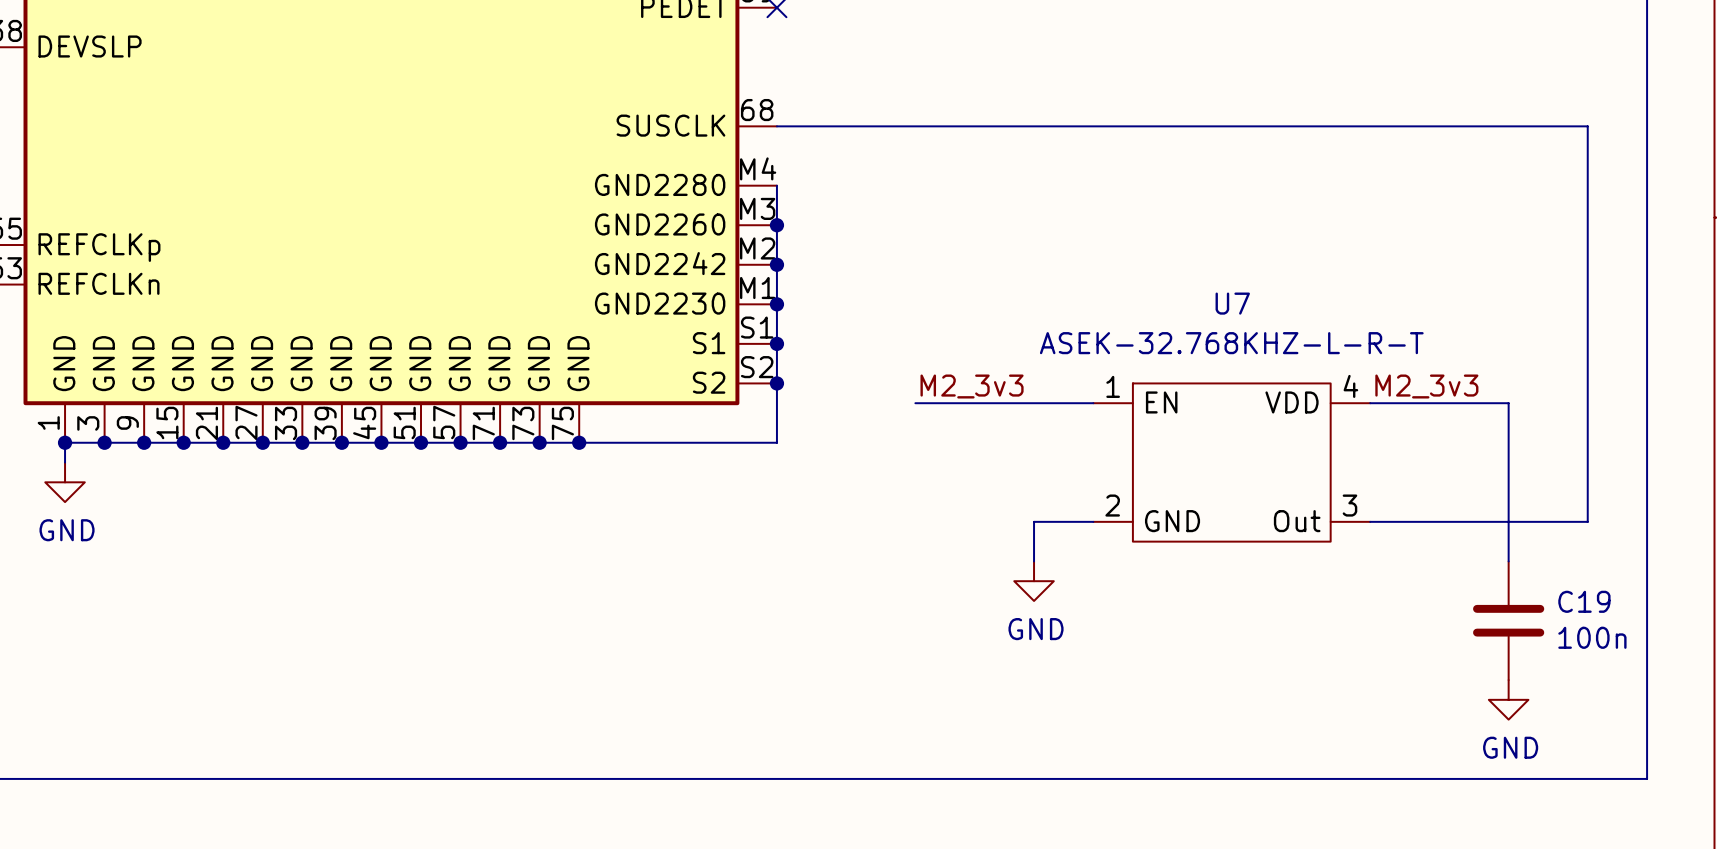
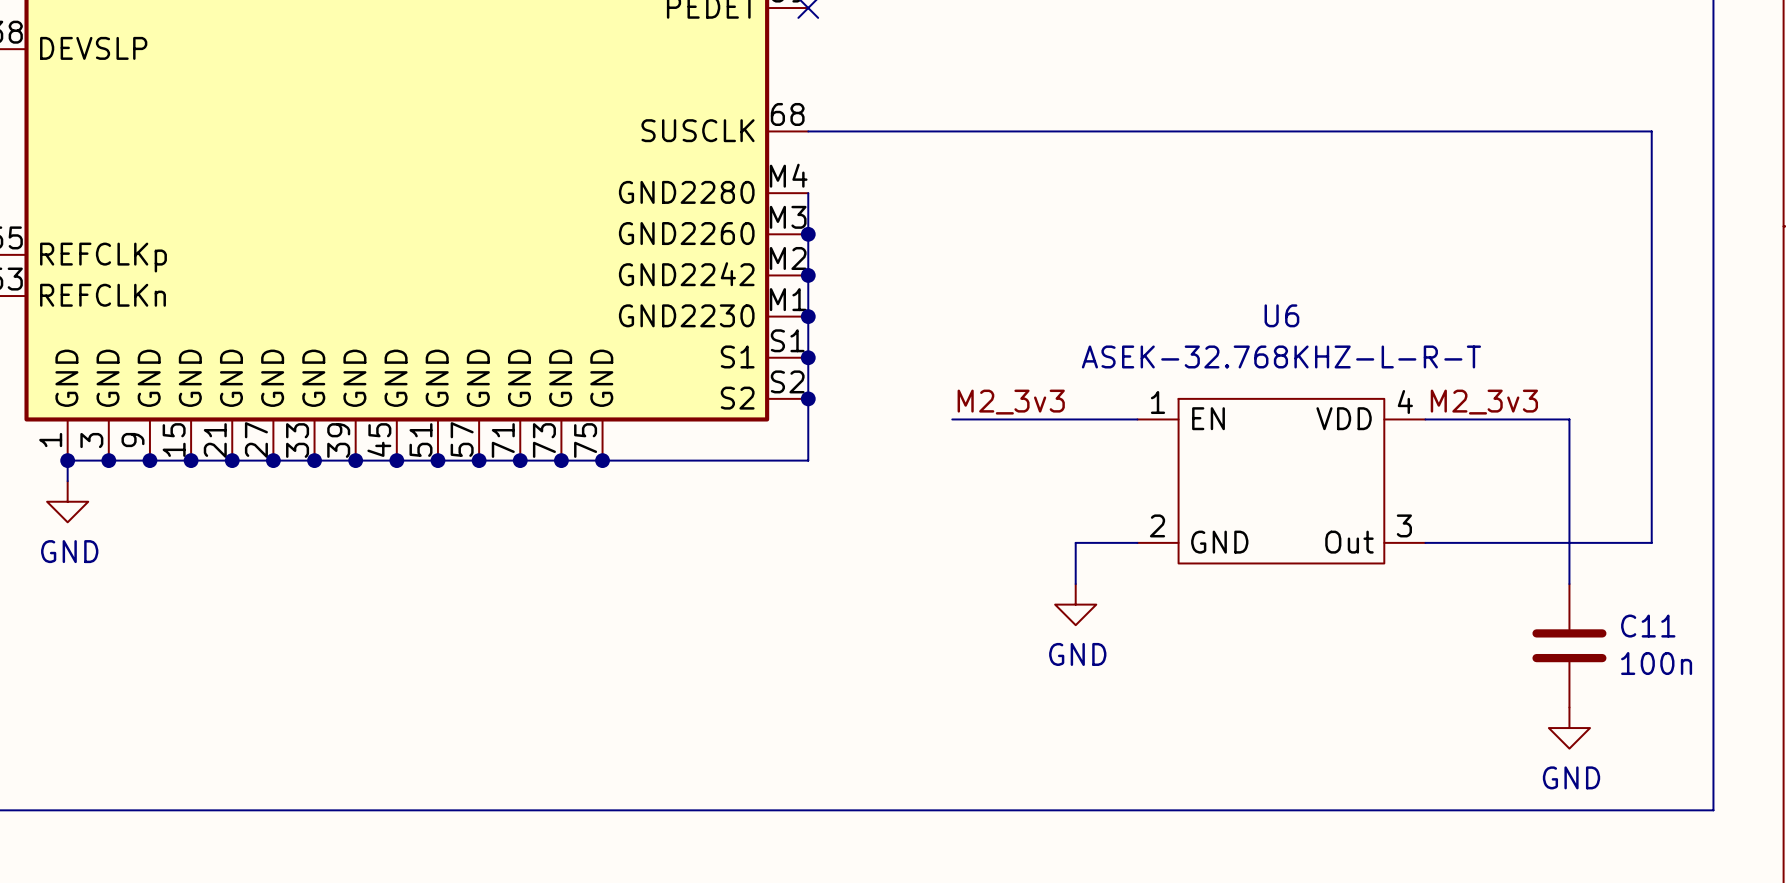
U7 name: U7 (1232, 303) -> U6 (1281, 315)
C19 name: C19 (1584, 601) -> C11 (1648, 626)

